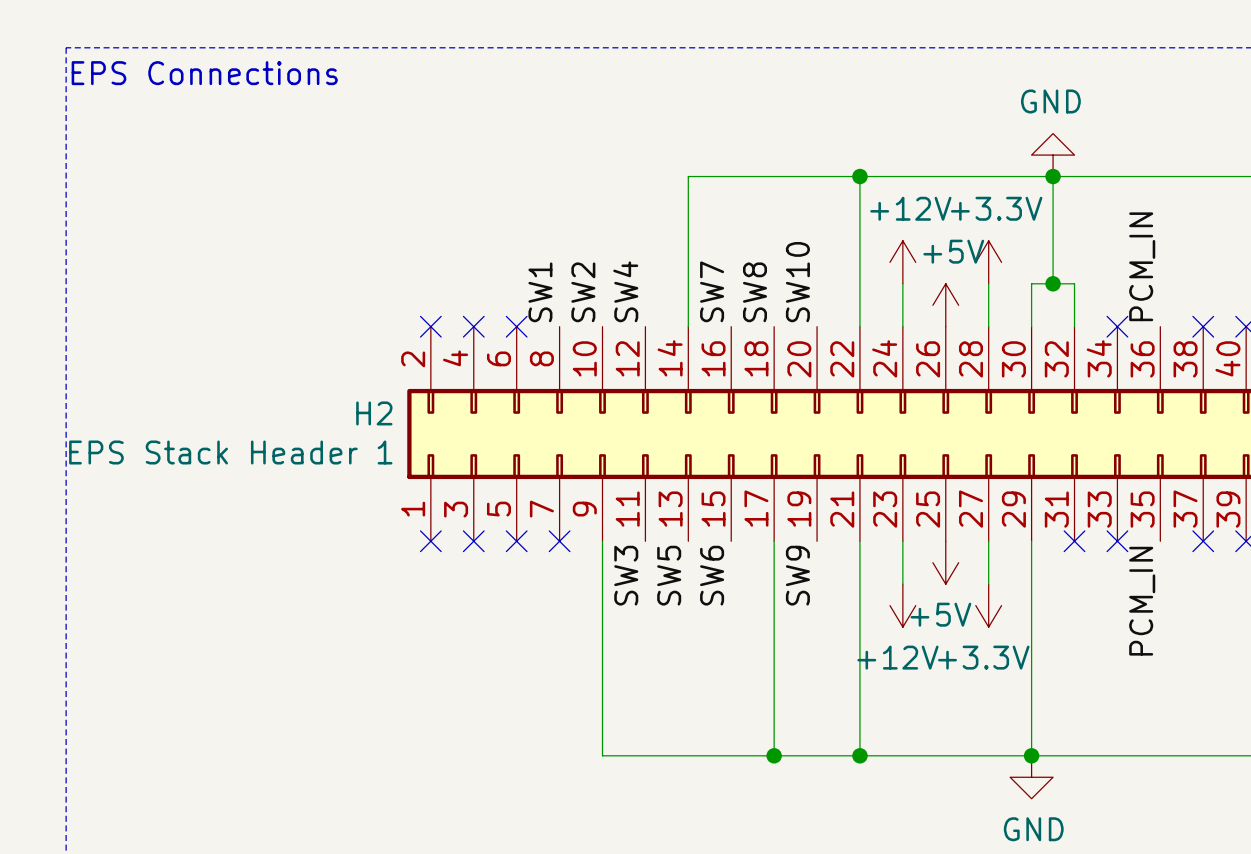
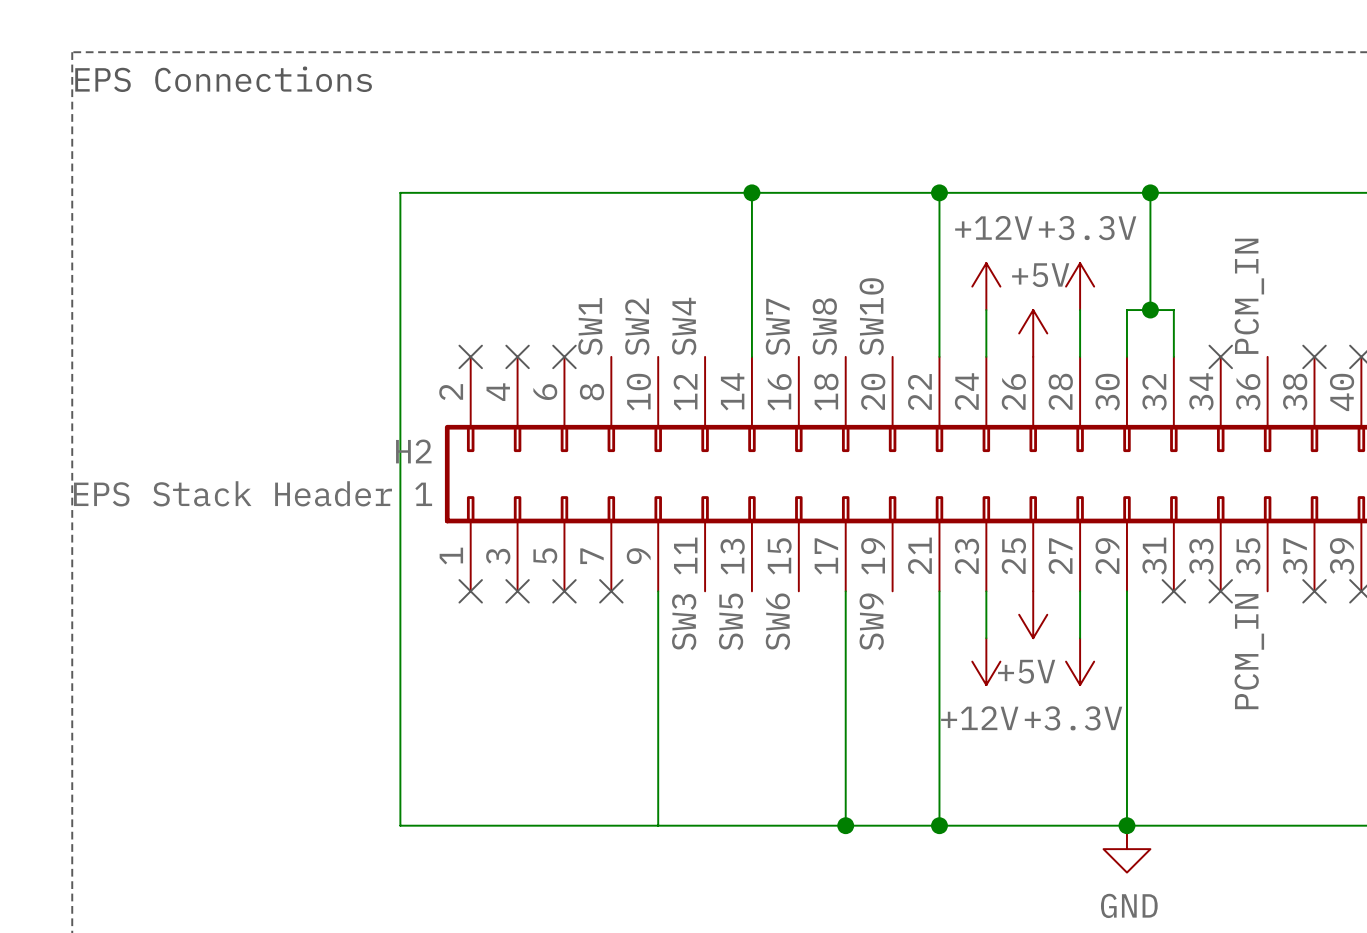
power symbol: GND (1053, 155) -> none
wire: none -> (751, 192) (400, 192) (400, 825) (658, 825)
junction: none -> (751, 192)

